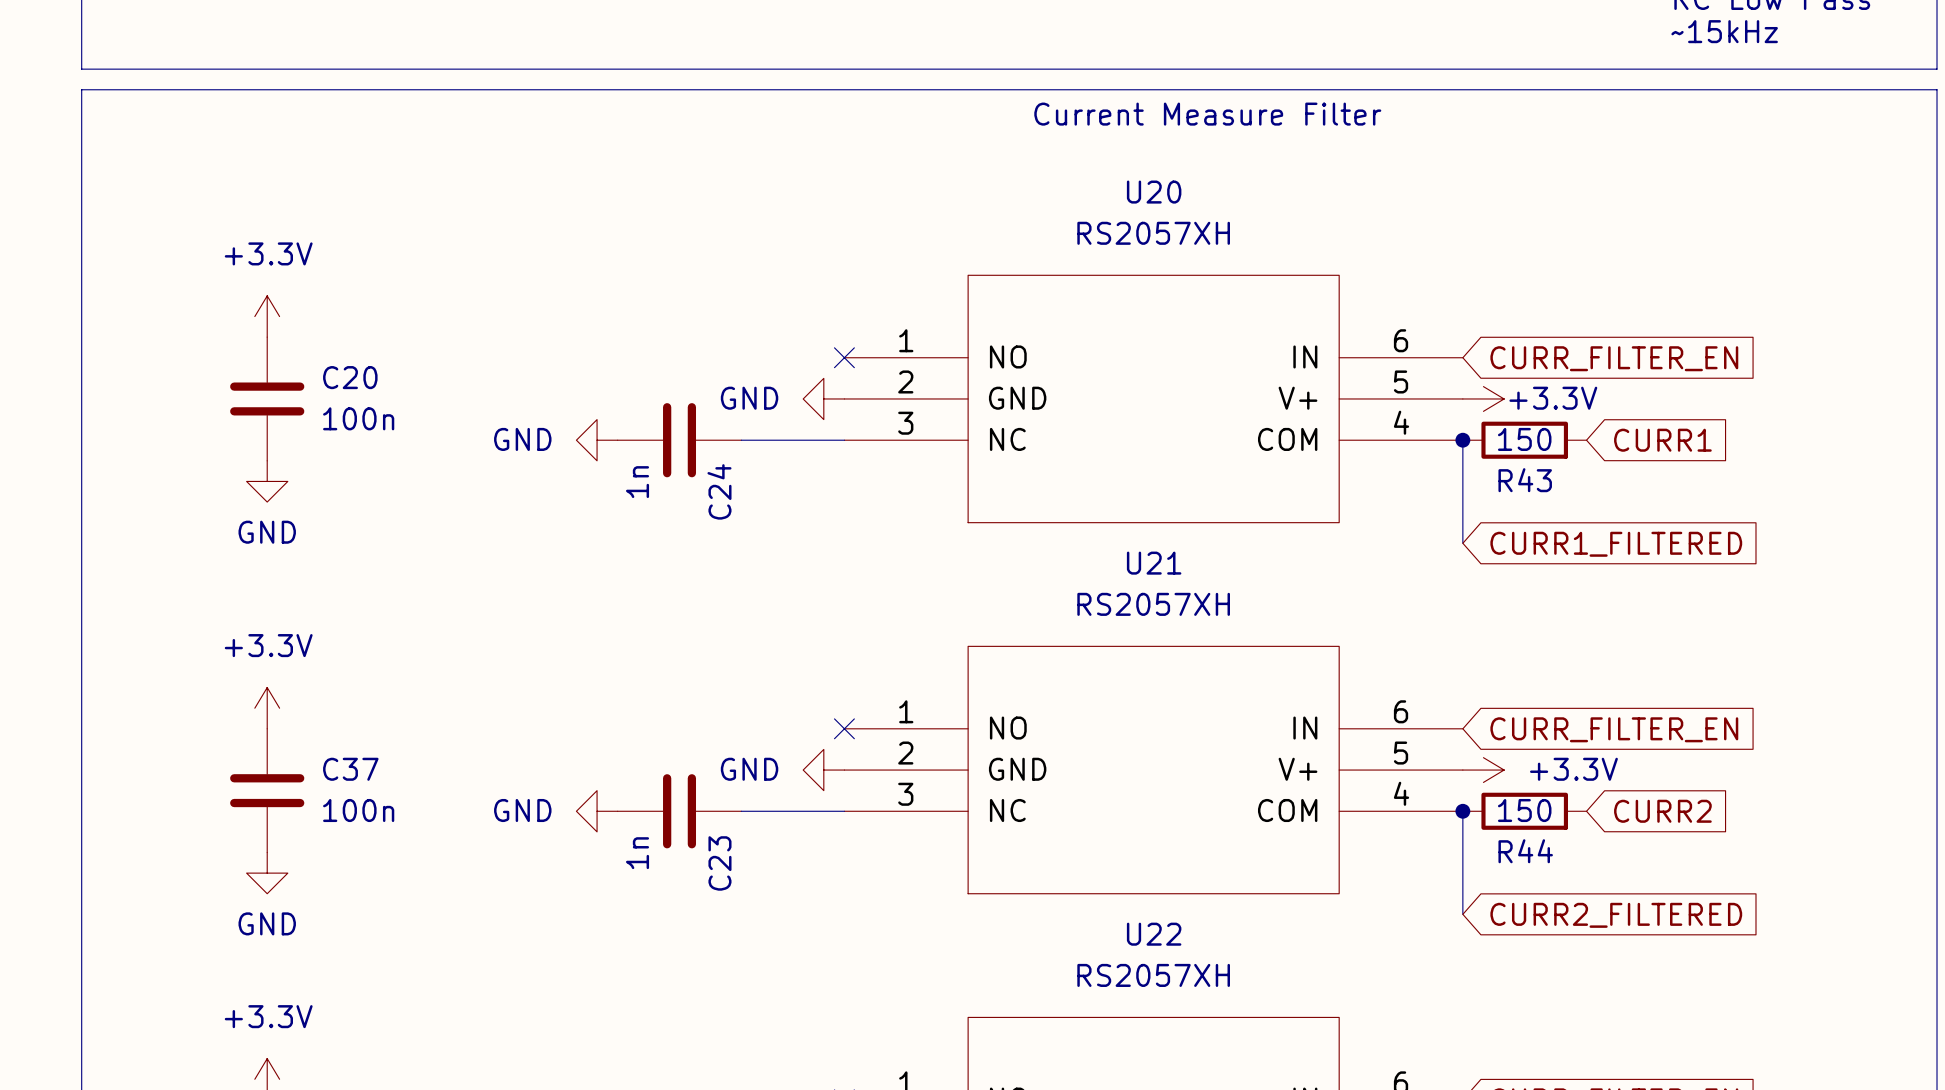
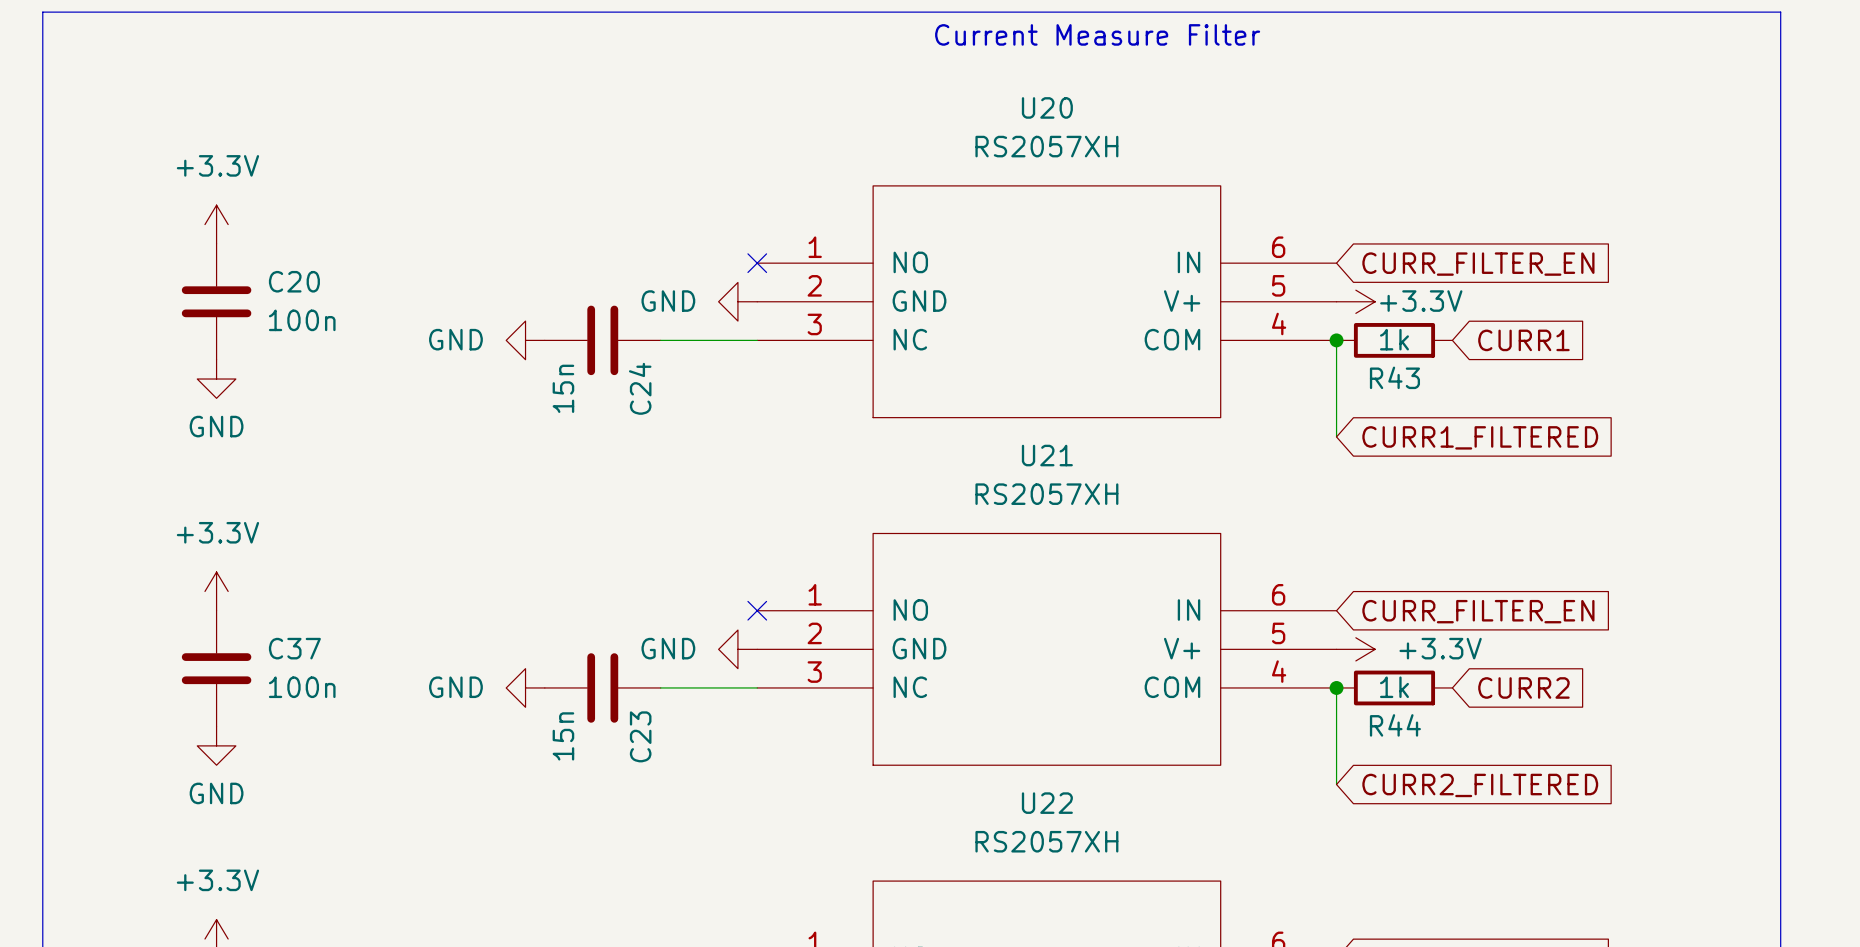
R43 value: 150 (1524, 439) -> 1k (1394, 339)
C24 value: 1n (637, 482) -> 15n (563, 388)
R44 value: 150 (1524, 810) -> 1k (1394, 687)
C23 value: 1n (637, 853) -> 15n (563, 736)

